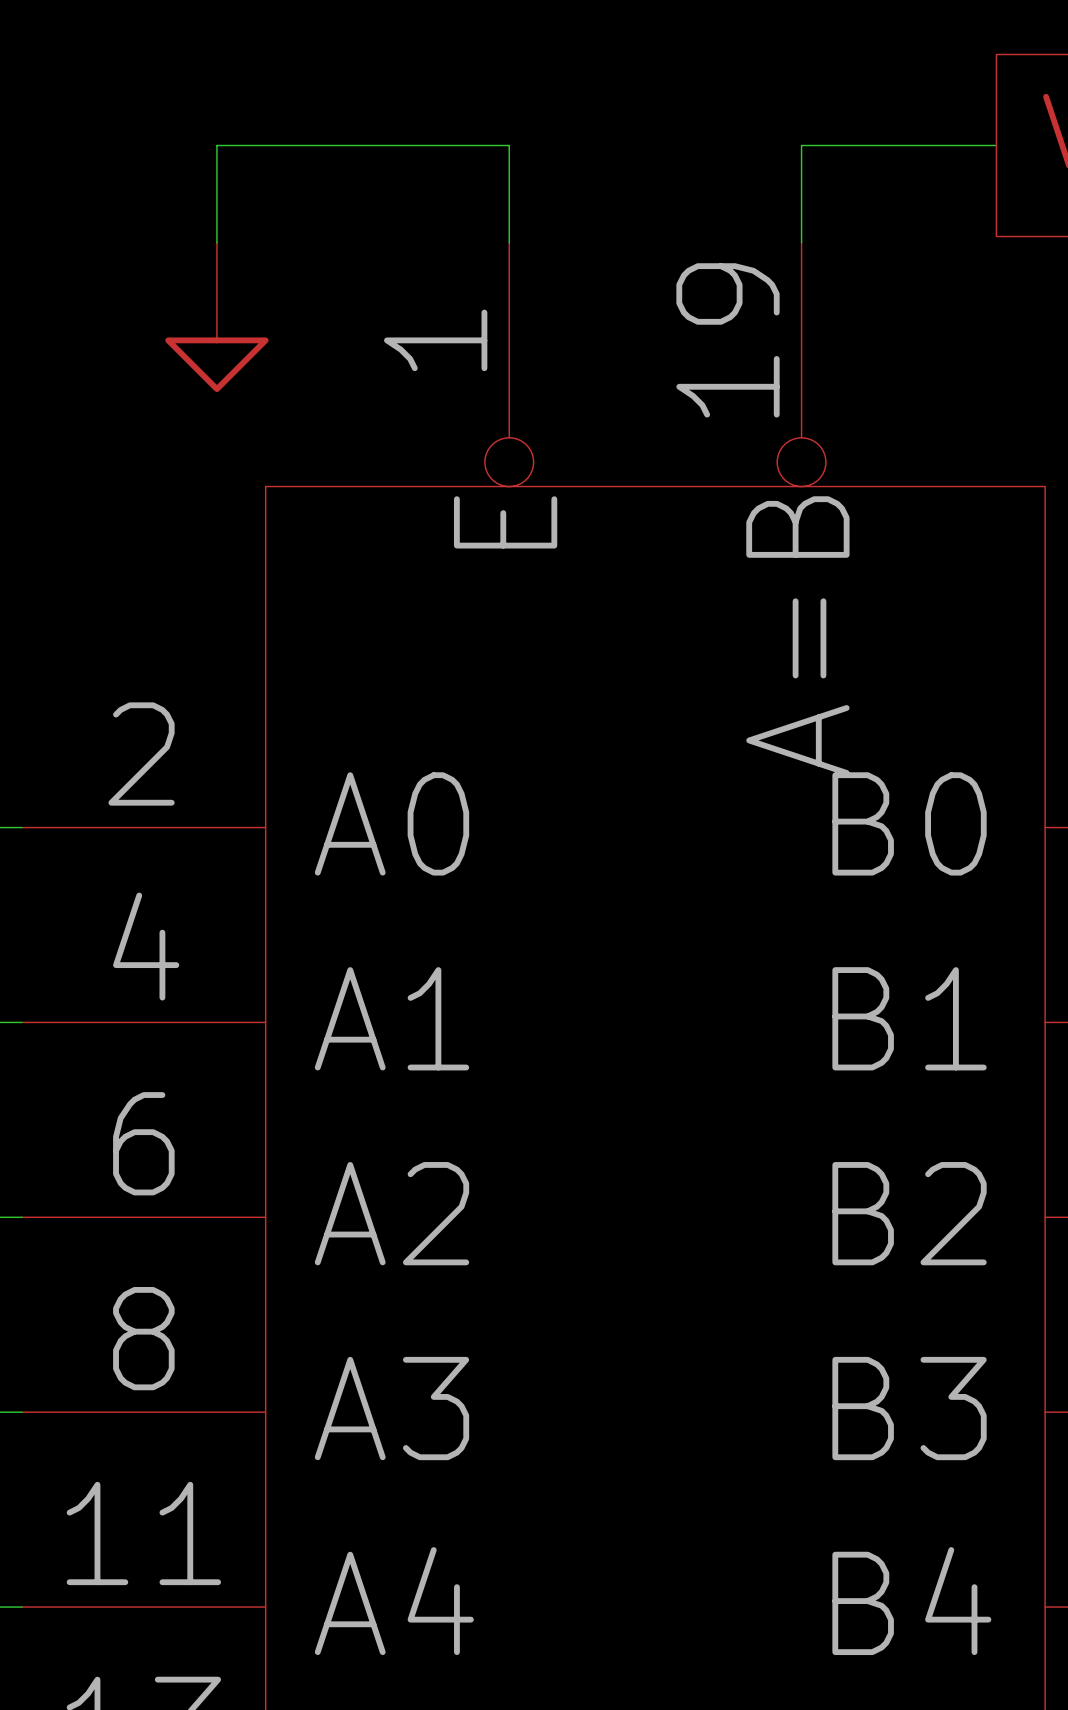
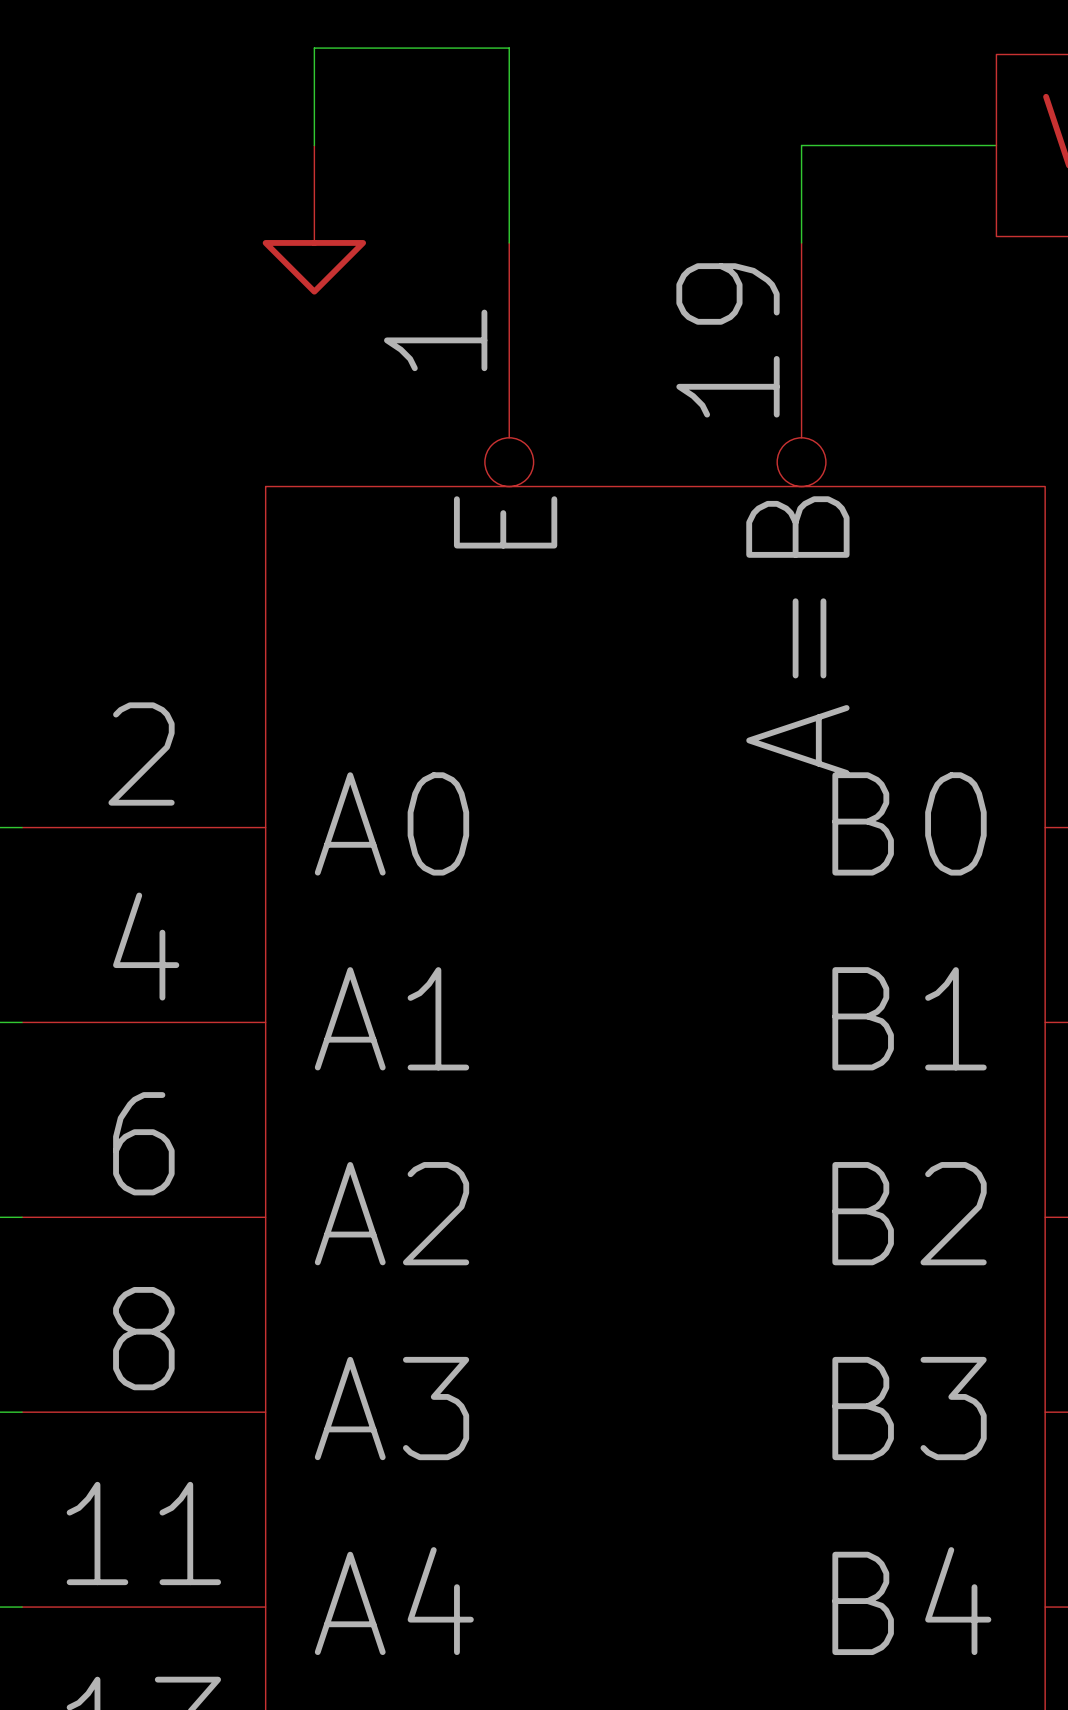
wire: (509, 145) (216, 145) (216, 242) -> (509, 145) (509, 48) (314, 48) (314, 145)
power symbol position: (216, 317) -> (314, 220)

